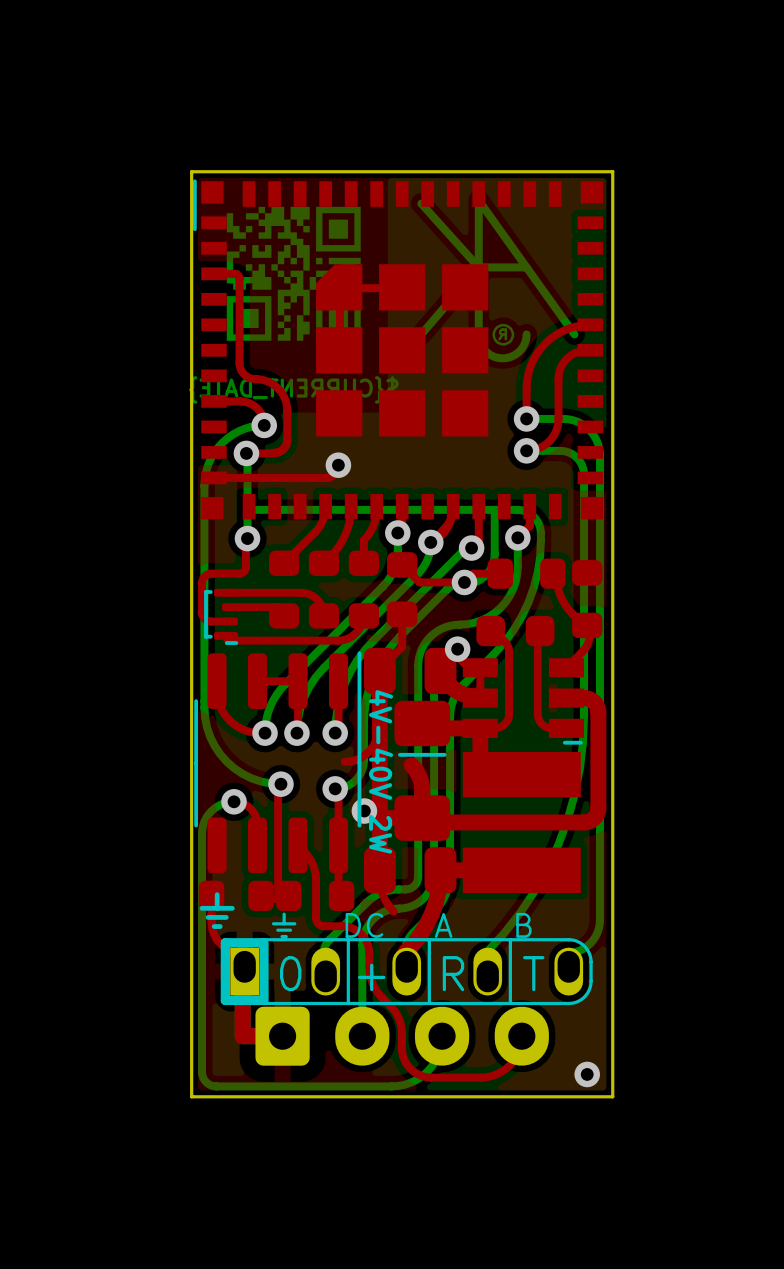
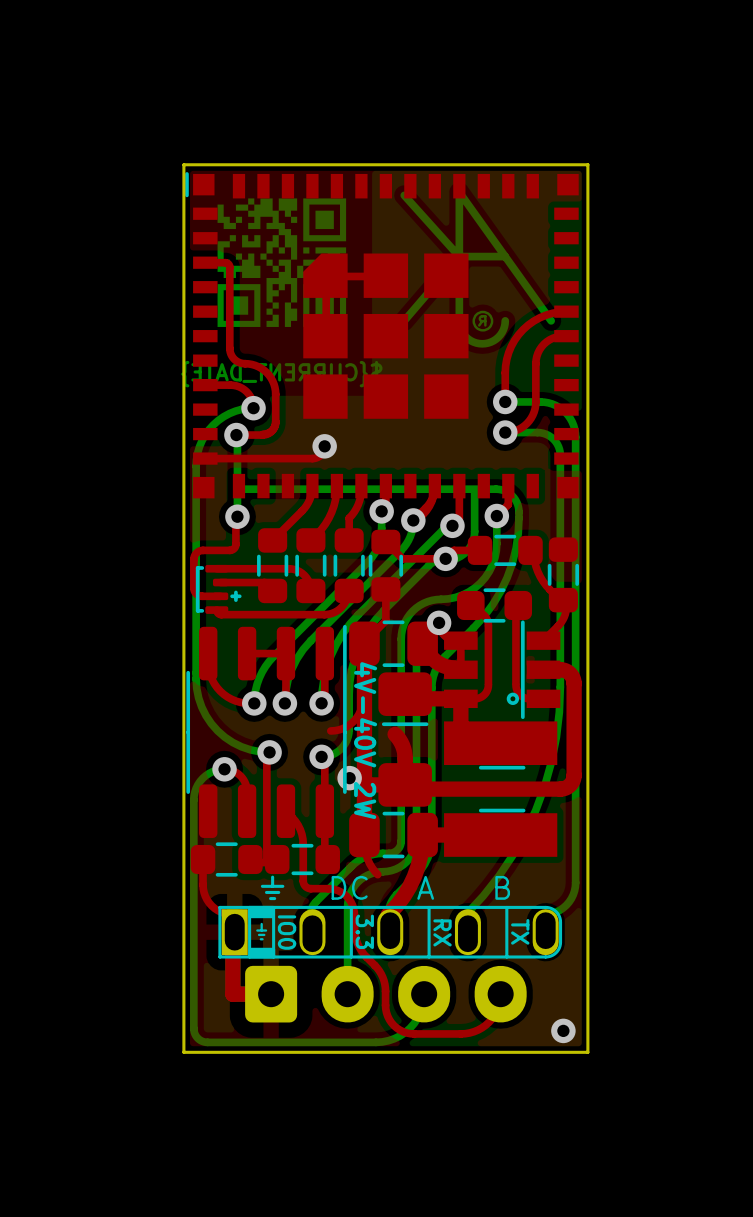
part footprint: [192, 179, 604, 520] -> [185, 172, 579, 499]
part footprint: [269, 550, 300, 629] -> [257, 528, 289, 604]
part footprint: [308, 550, 340, 629] -> [295, 528, 327, 604]
part footprint: [348, 550, 380, 629] -> [333, 528, 365, 604]
part footprint: [387, 552, 418, 628] -> [368, 529, 404, 602]
part footprint: [487, 558, 566, 589] -> [467, 534, 543, 567]
part footprint: [572, 560, 603, 639] -> [547, 537, 580, 613]
part footprint: [204, 588, 239, 645] -> [195, 564, 242, 614]
drawing: none -> [483, 588, 506, 623]
part footprint: [363, 615, 607, 894] -> [349, 590, 582, 858]
drawing: none -> [382, 620, 405, 668]
drawing: none -> [478, 765, 526, 813]
drawing: none -> [382, 811, 405, 859]
part footprint: [198, 880, 274, 911] -> [190, 842, 263, 877]
part footprint: [276, 880, 355, 911] -> [265, 843, 340, 876]
part footprint: [220, 938, 593, 1006] -> [218, 905, 563, 959]

